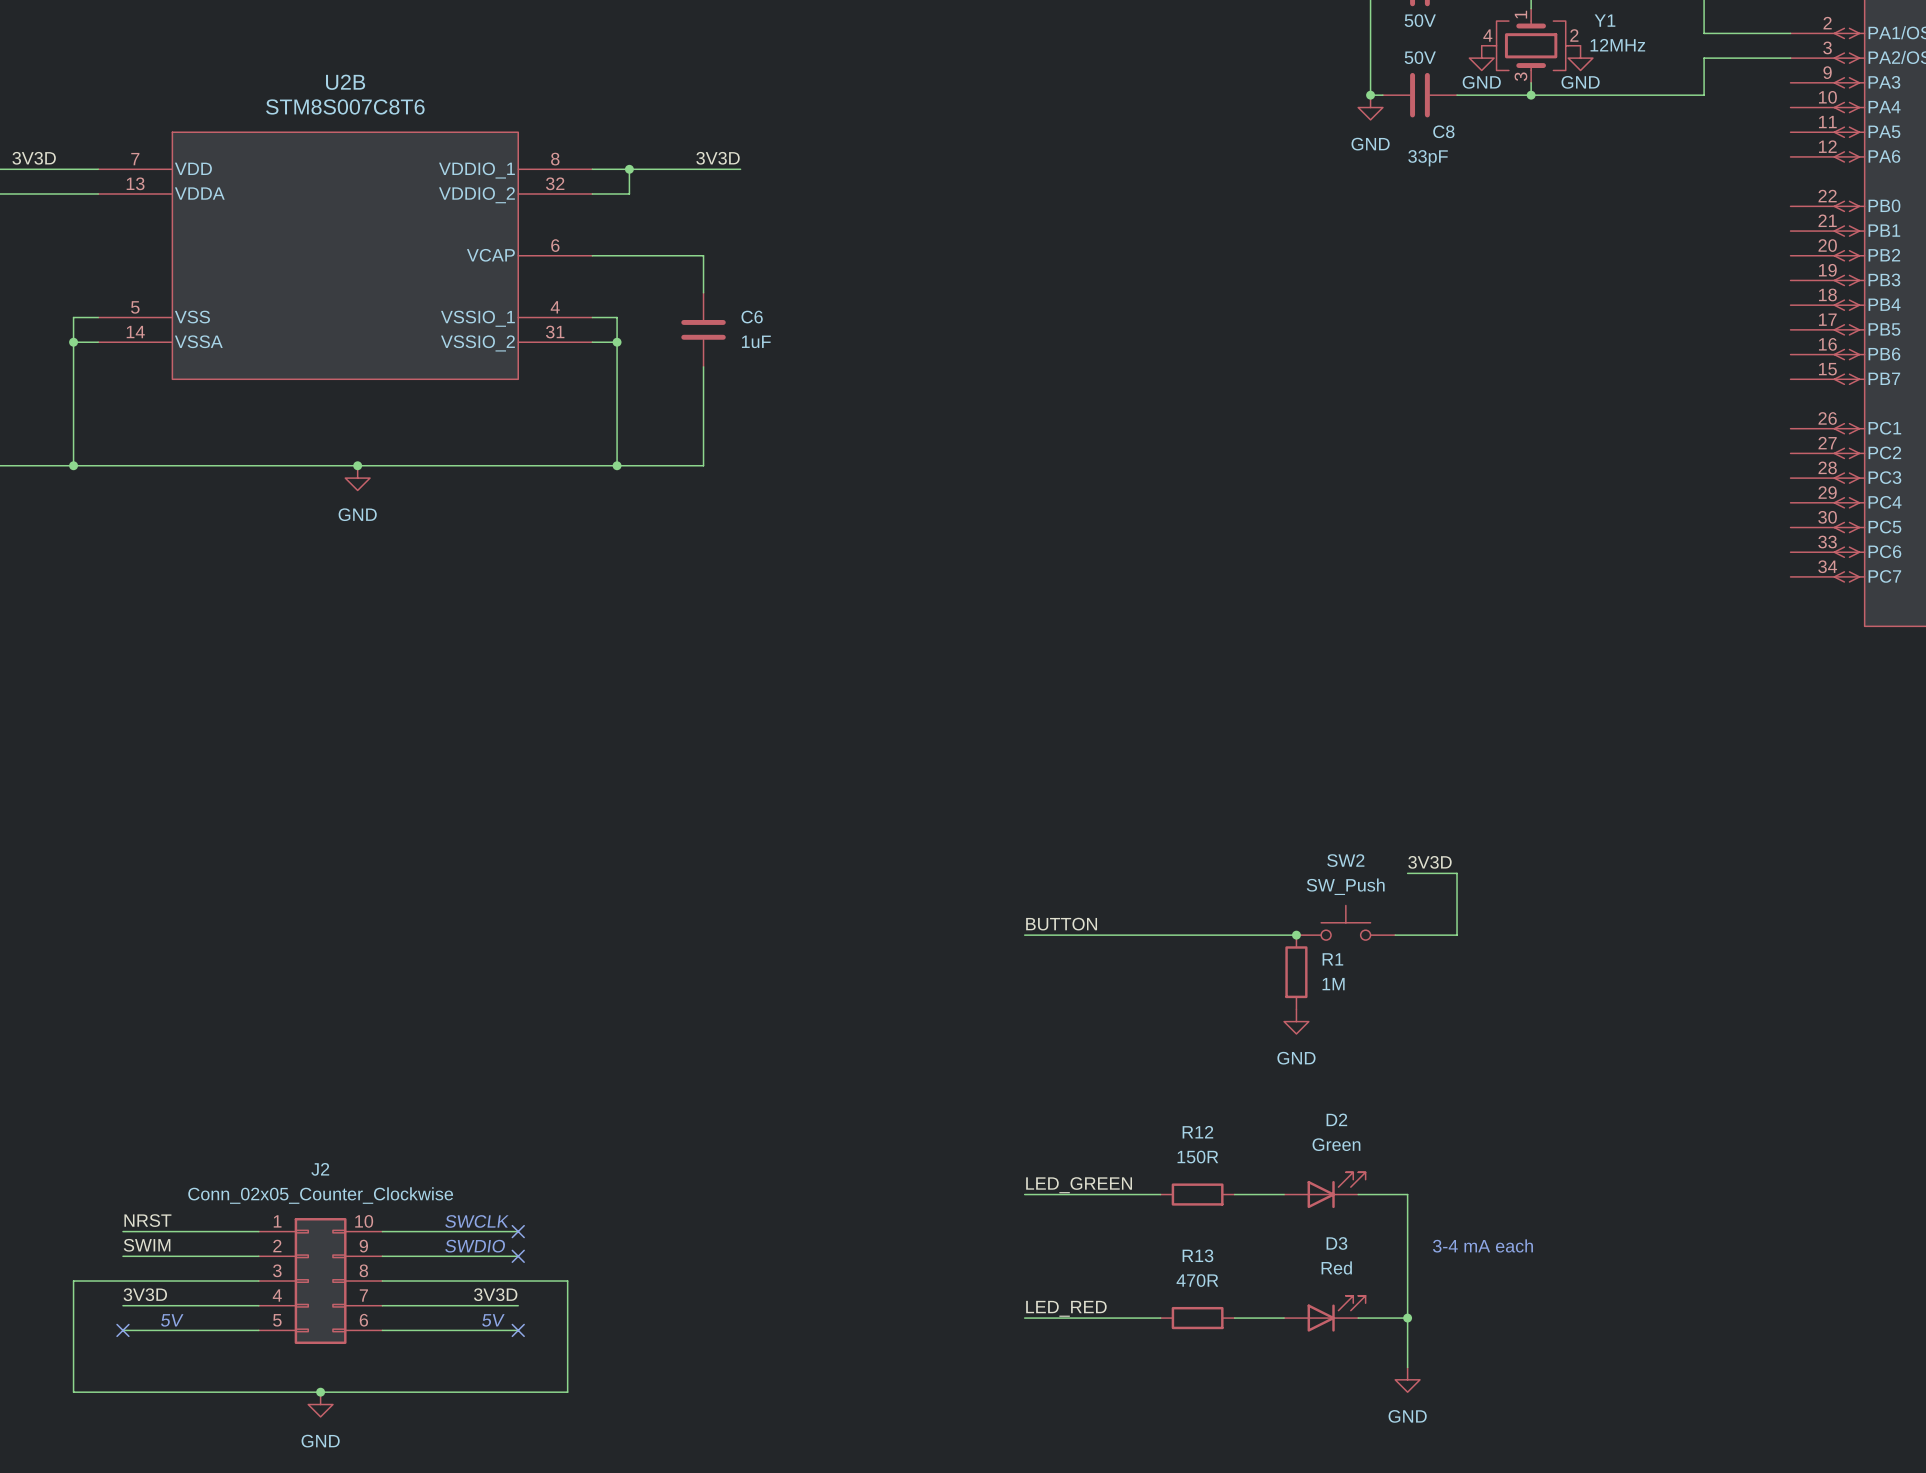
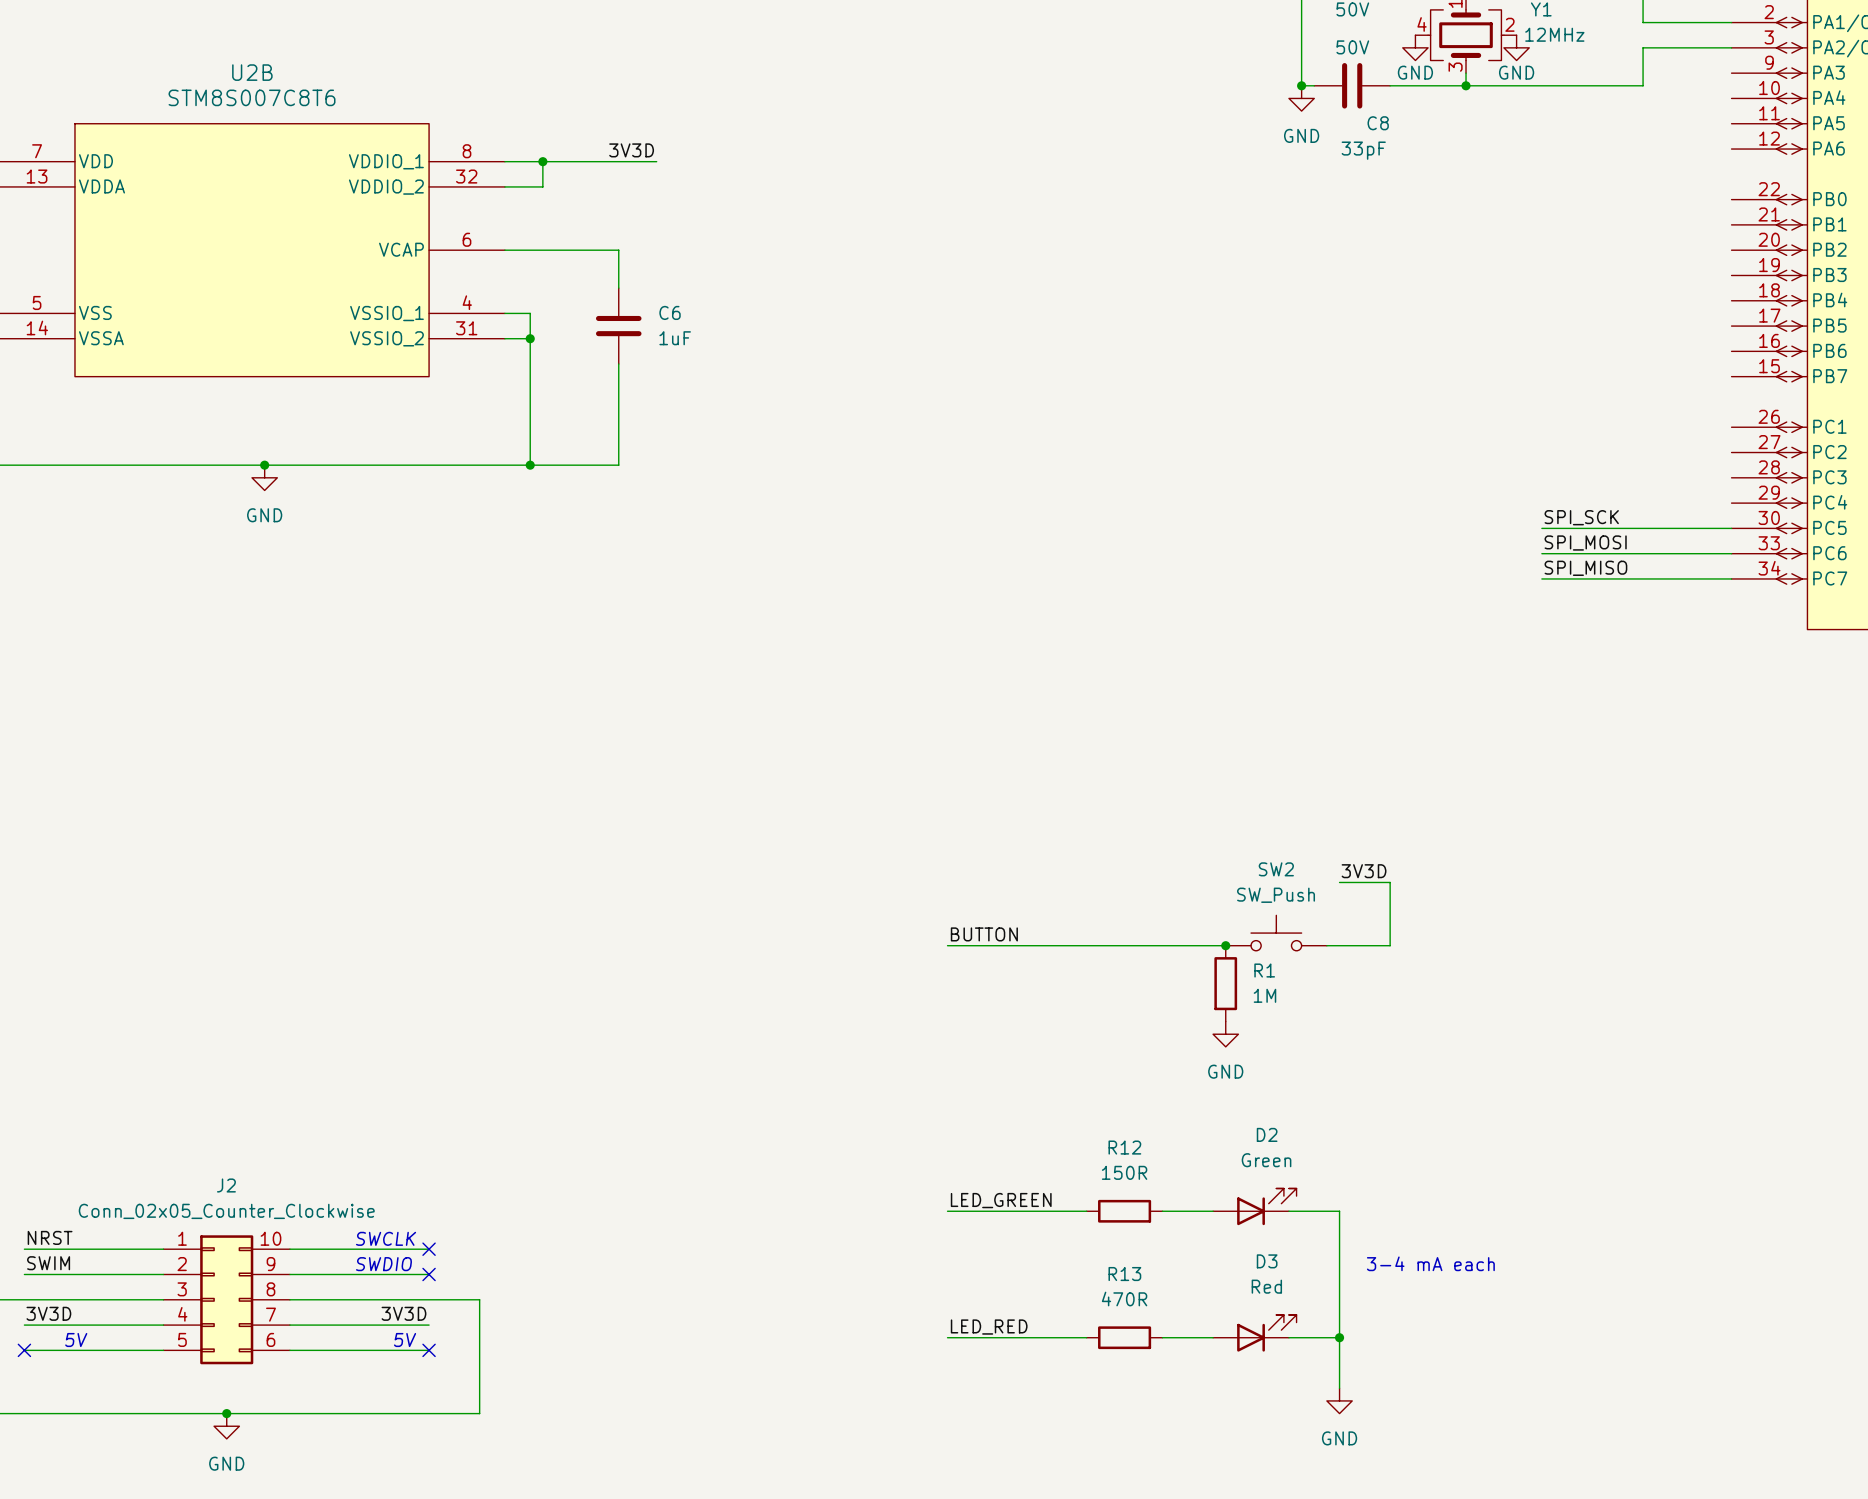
label: none -> SPI_SCK (1581, 517)
wire: none -> (1541, 528) (1731, 528)
label: none -> SPI_MOSI (1585, 543)
wire: none -> (1541, 553) (1731, 553)
label: none -> SPI_MISO (1585, 568)
wire: none -> (1541, 578) (1731, 578)

